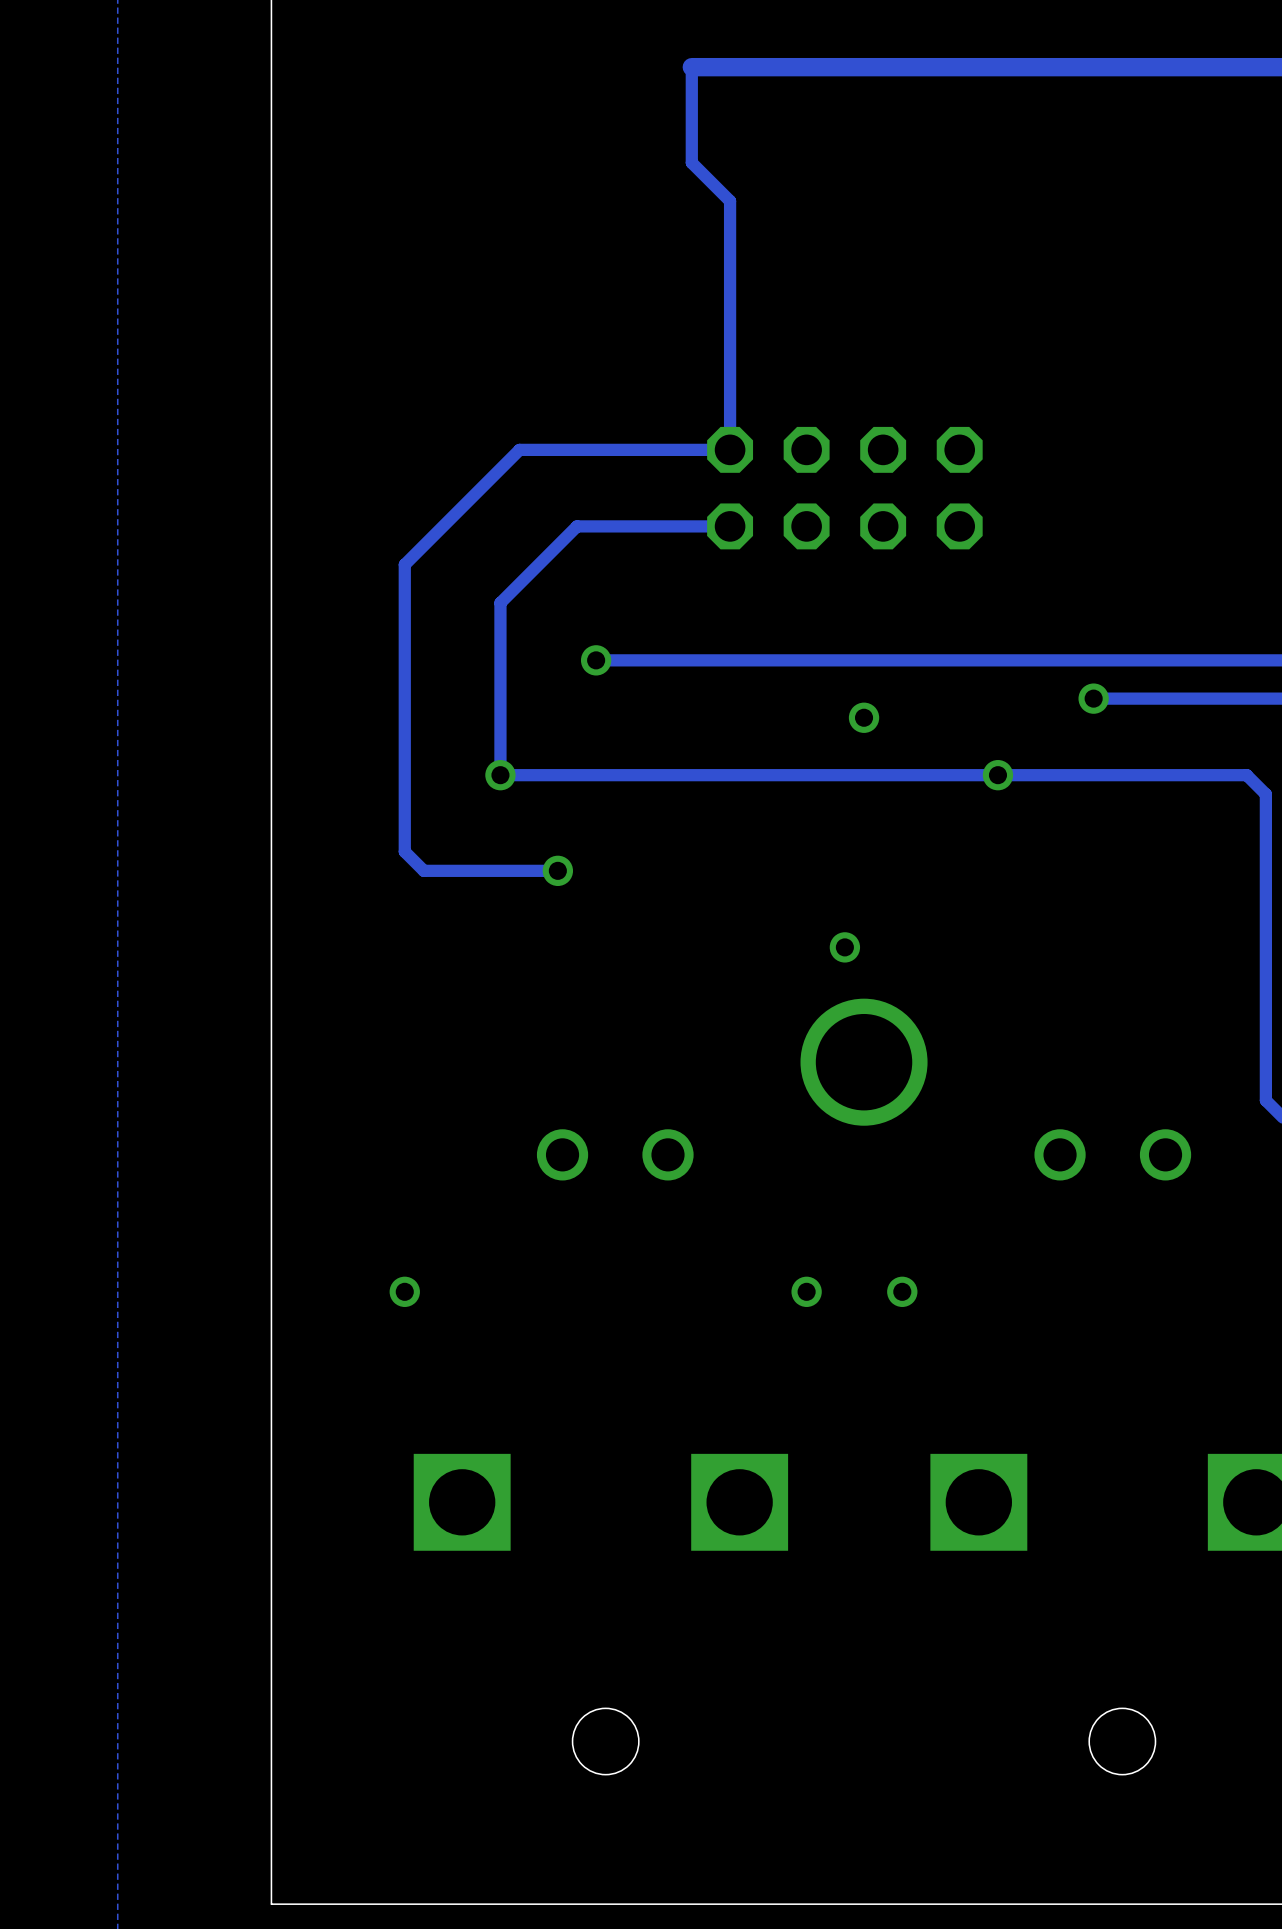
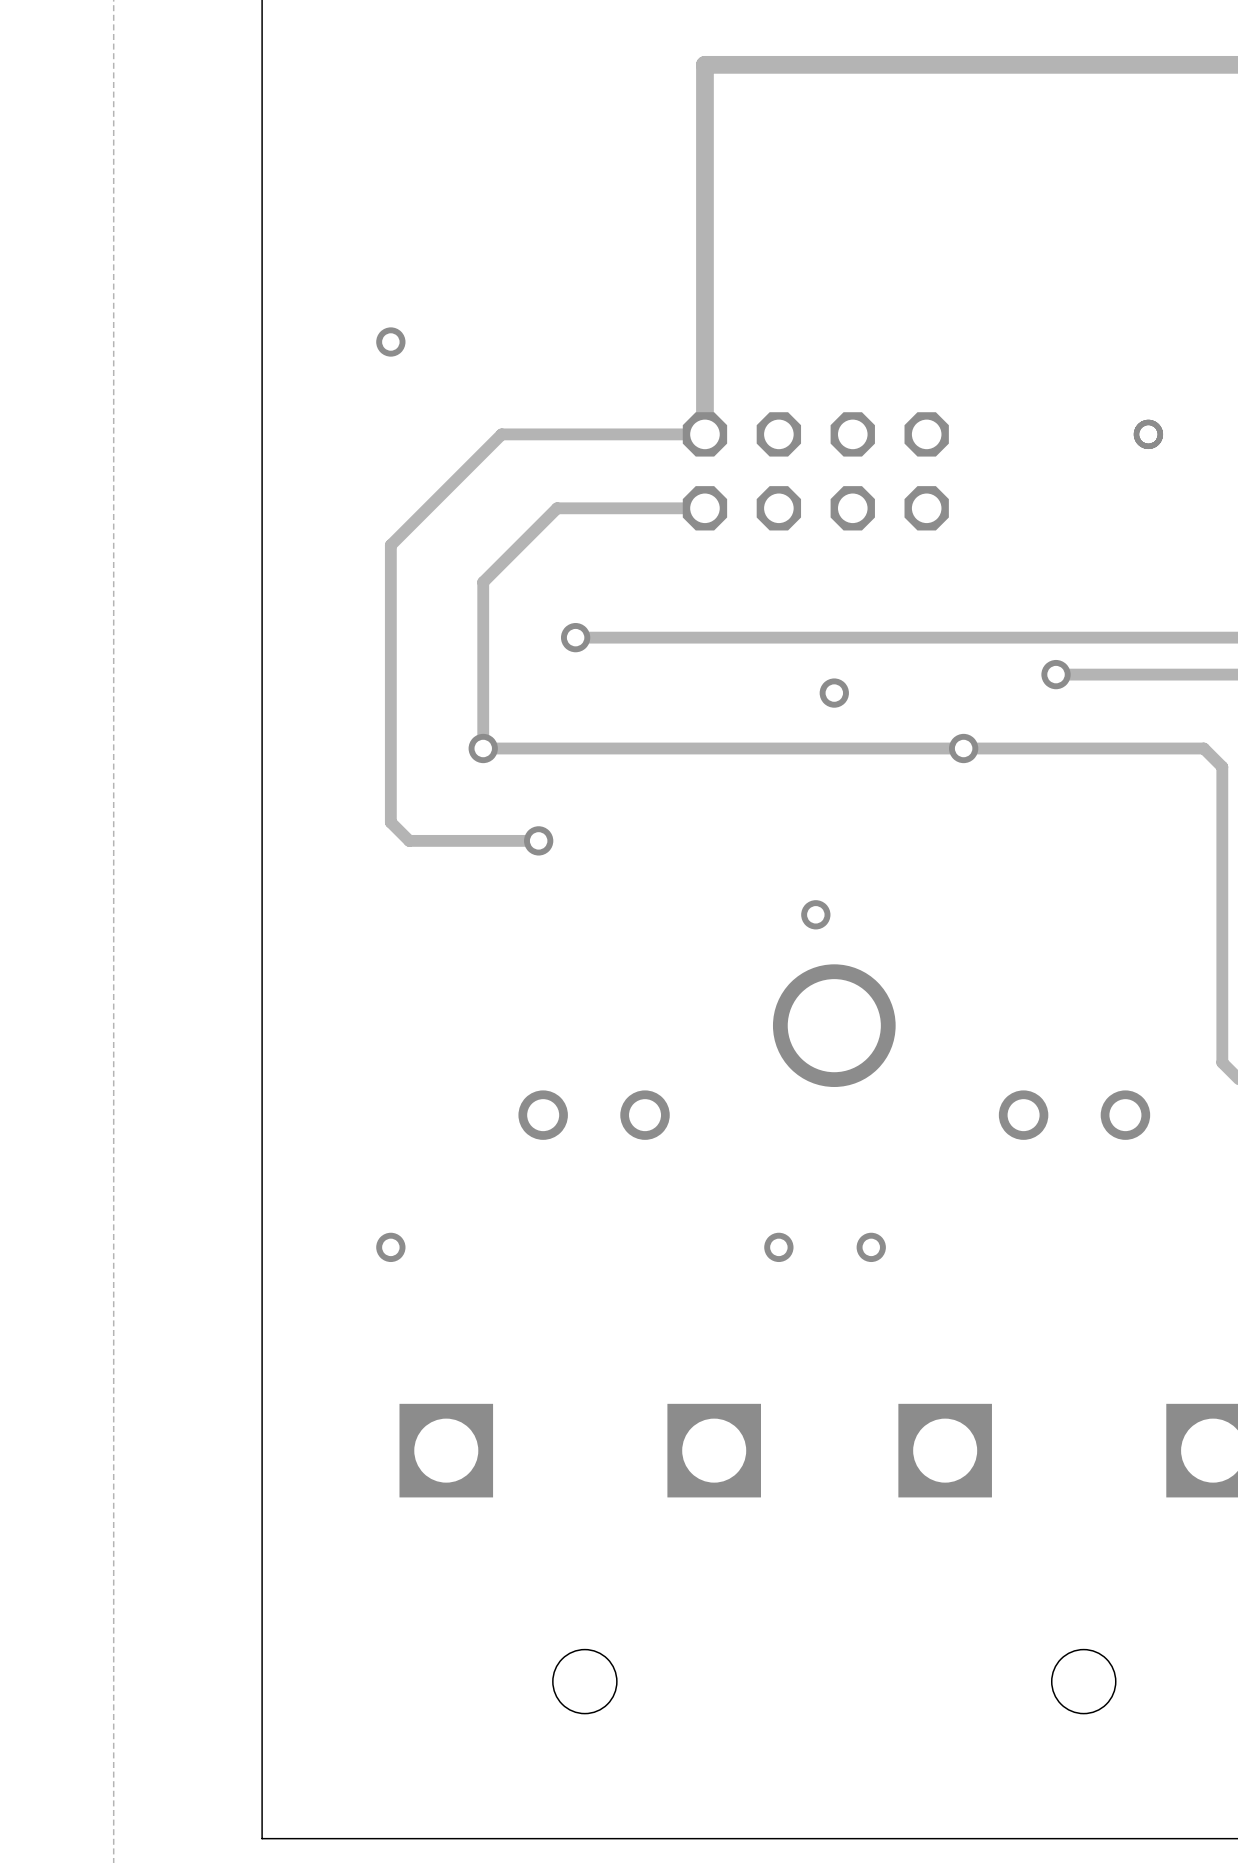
track: (730, 67) (691, 67) (691, 162) (730, 201) -> (704, 64) (704, 194)
track width: thin (730, 201) (730, 449) -> thick (704, 194) (704, 434)
via: none -> (390, 342)
via: none -> (1148, 434)

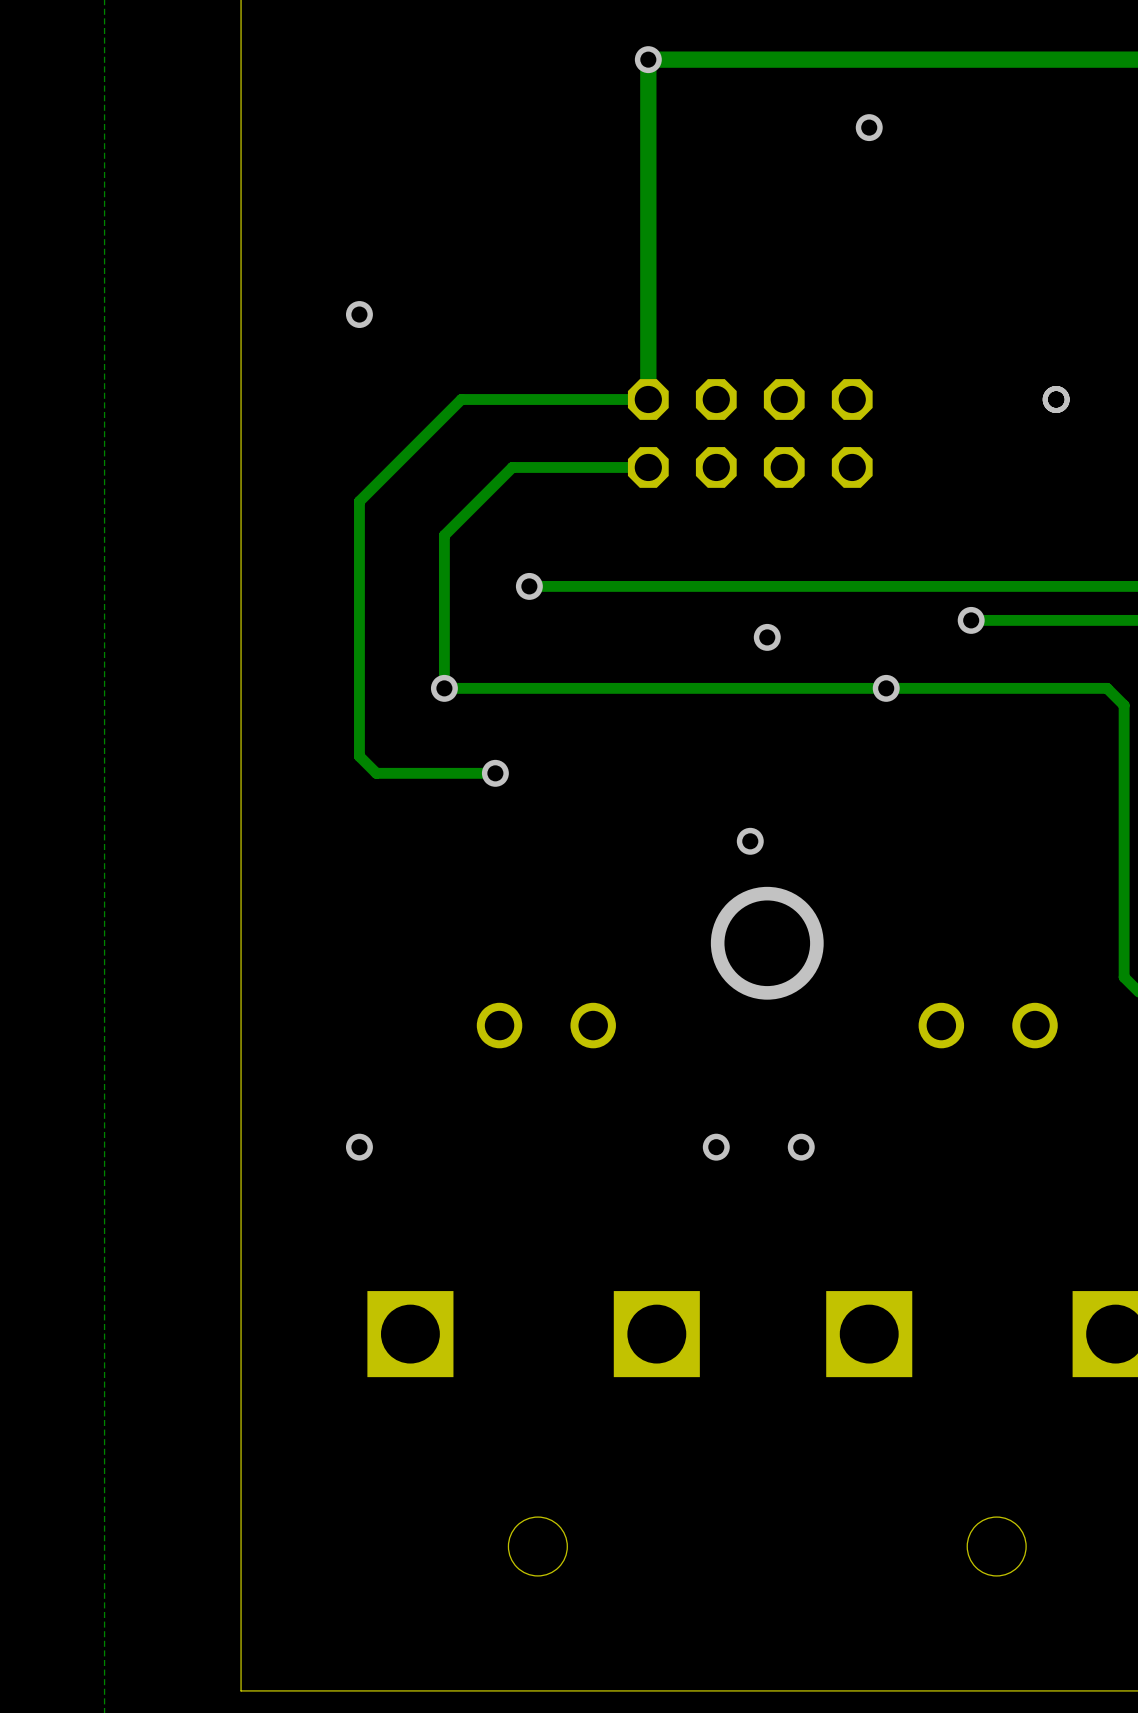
via: none -> (648, 59)
via: none -> (869, 127)

